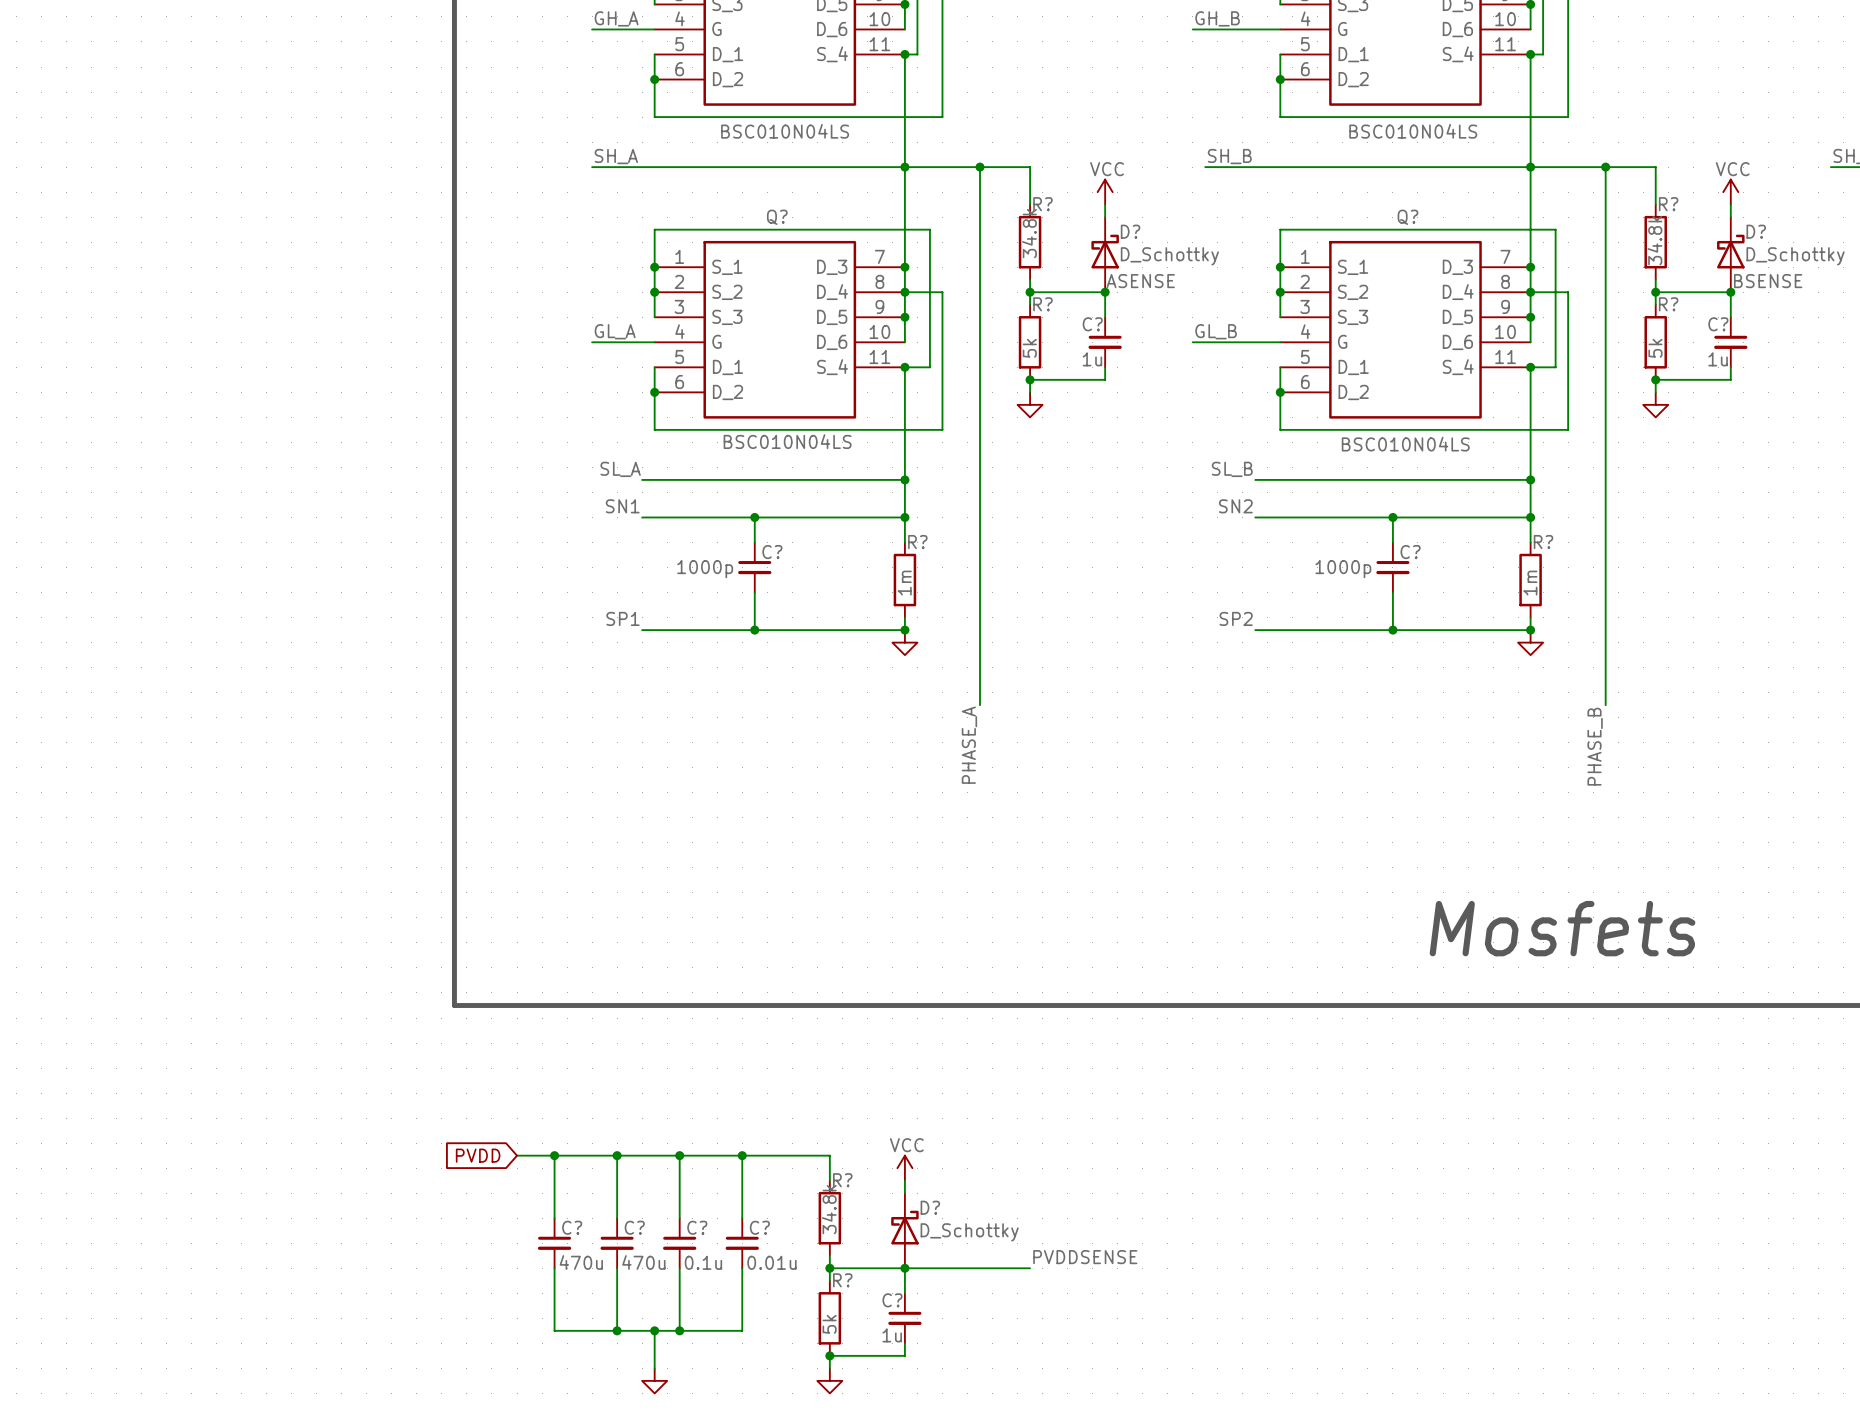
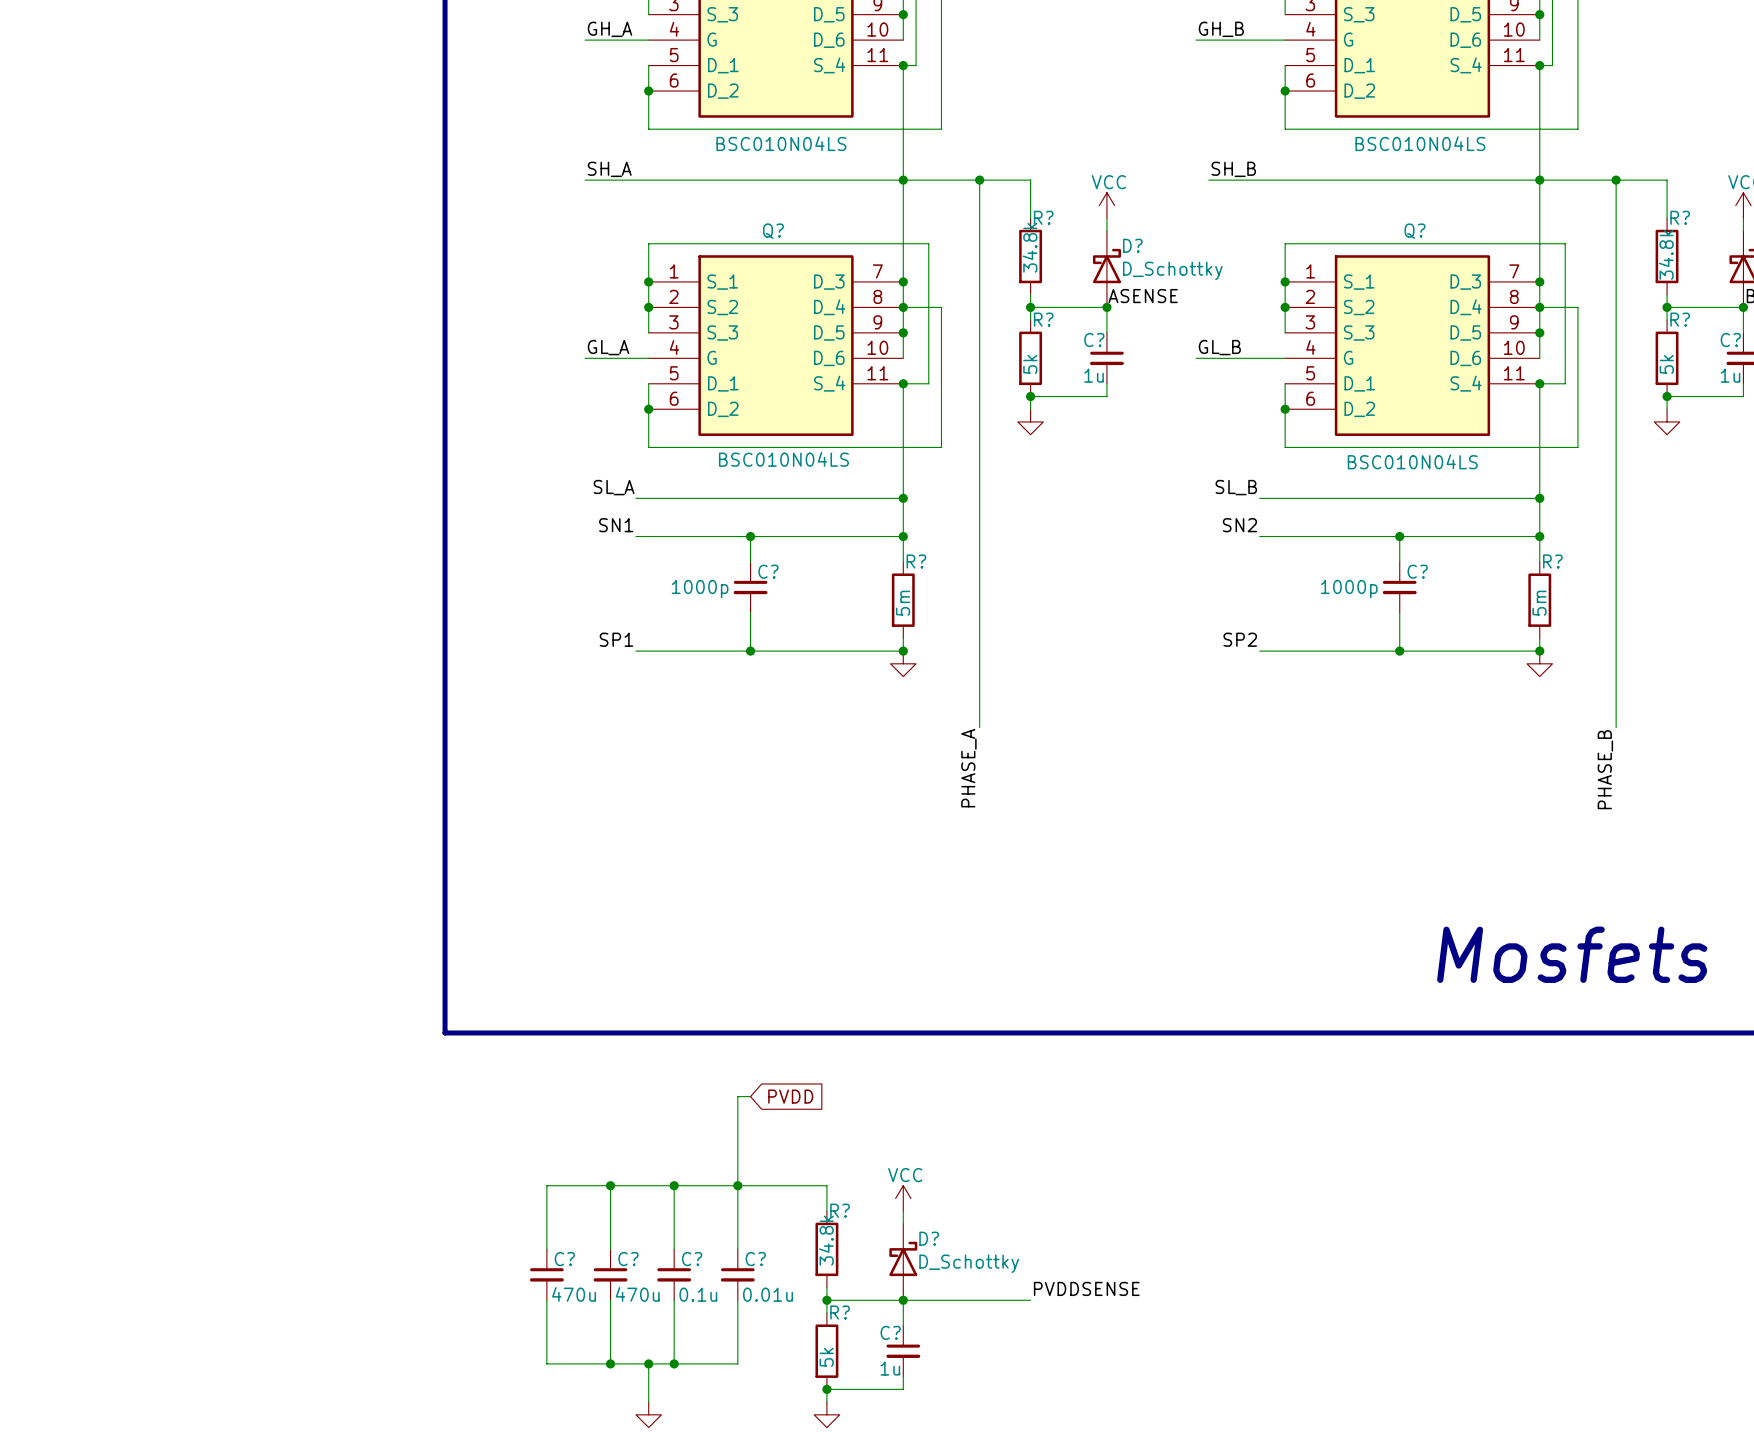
R? value: 1m (904, 583) -> 5m (903, 603)
R? value: 1m (1530, 583) -> 5m (1539, 603)
wire: none -> (750, 1096) (737, 1096) (737, 1185)
global label: none -> PVDD (790, 1096)
global label: PVDD (478, 1155) -> none
wire: (517, 1155) (554, 1155) -> none
junction: (554, 1155) -> none

